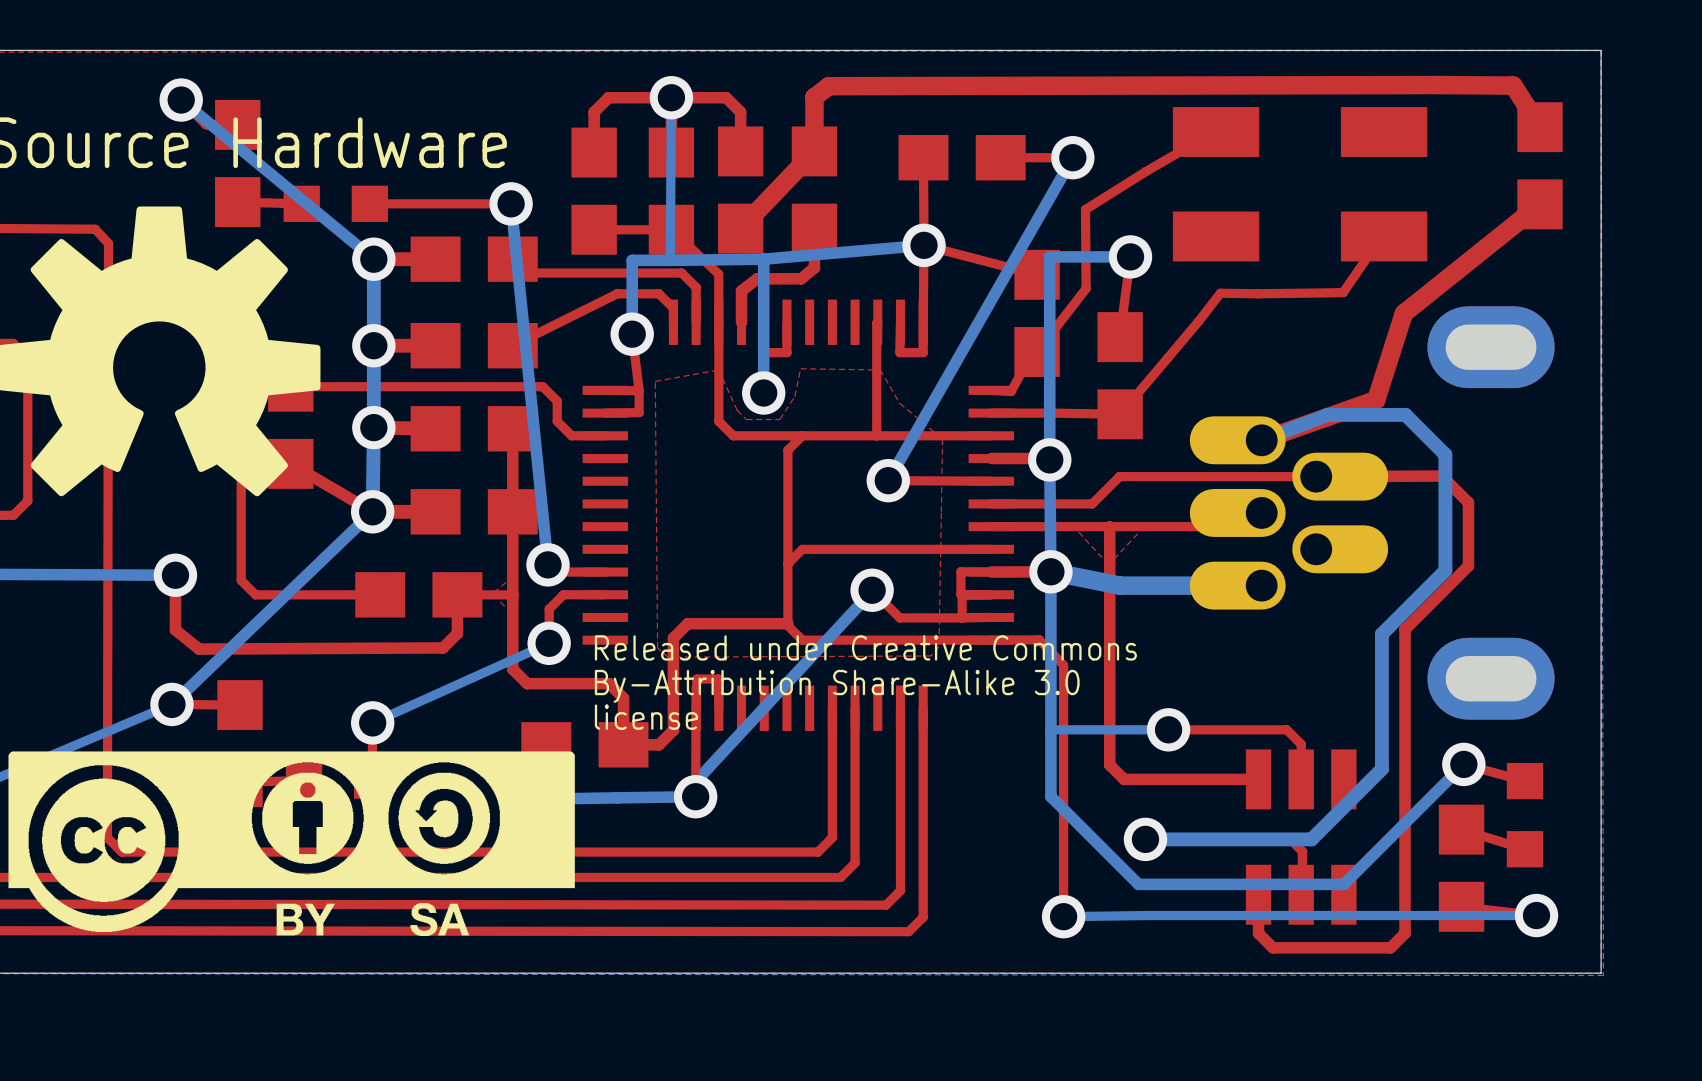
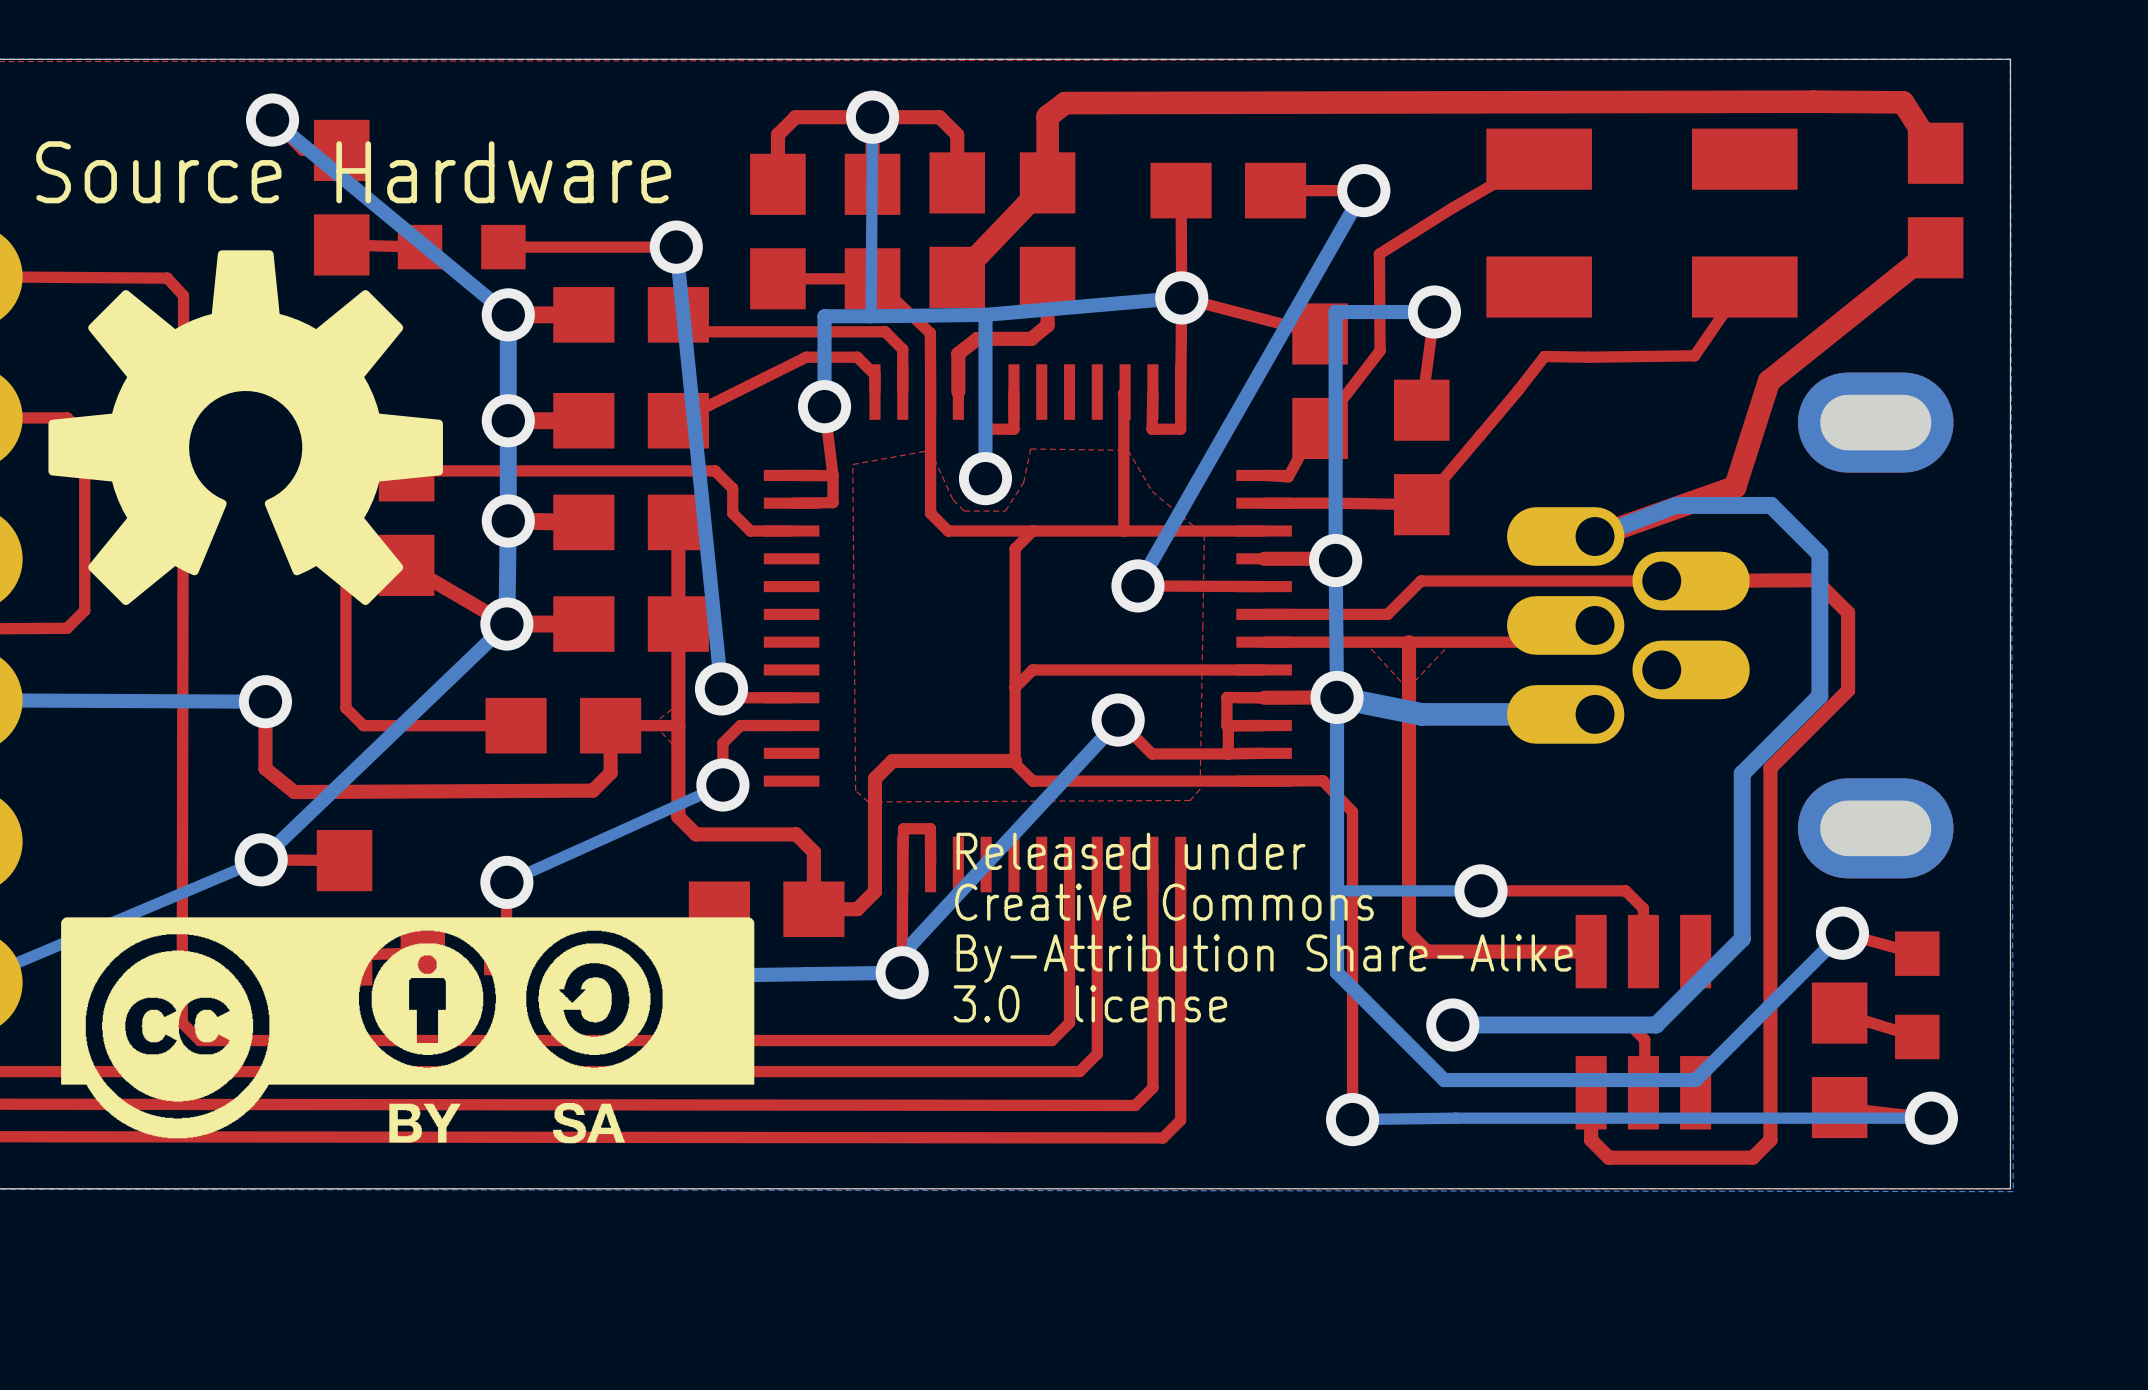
text: Released under Creative Commons (865, 647) -> Released under (1131, 851)
text: By-Attribution Share-Alike 3.0 (837, 686) -> none
text: license (646, 717) -> none
text: none -> Creative Commons (1164, 902)
text: none -> By-Attribution Share-Alike (1264, 958)
text: none -> 3.0 license (1090, 1003)

